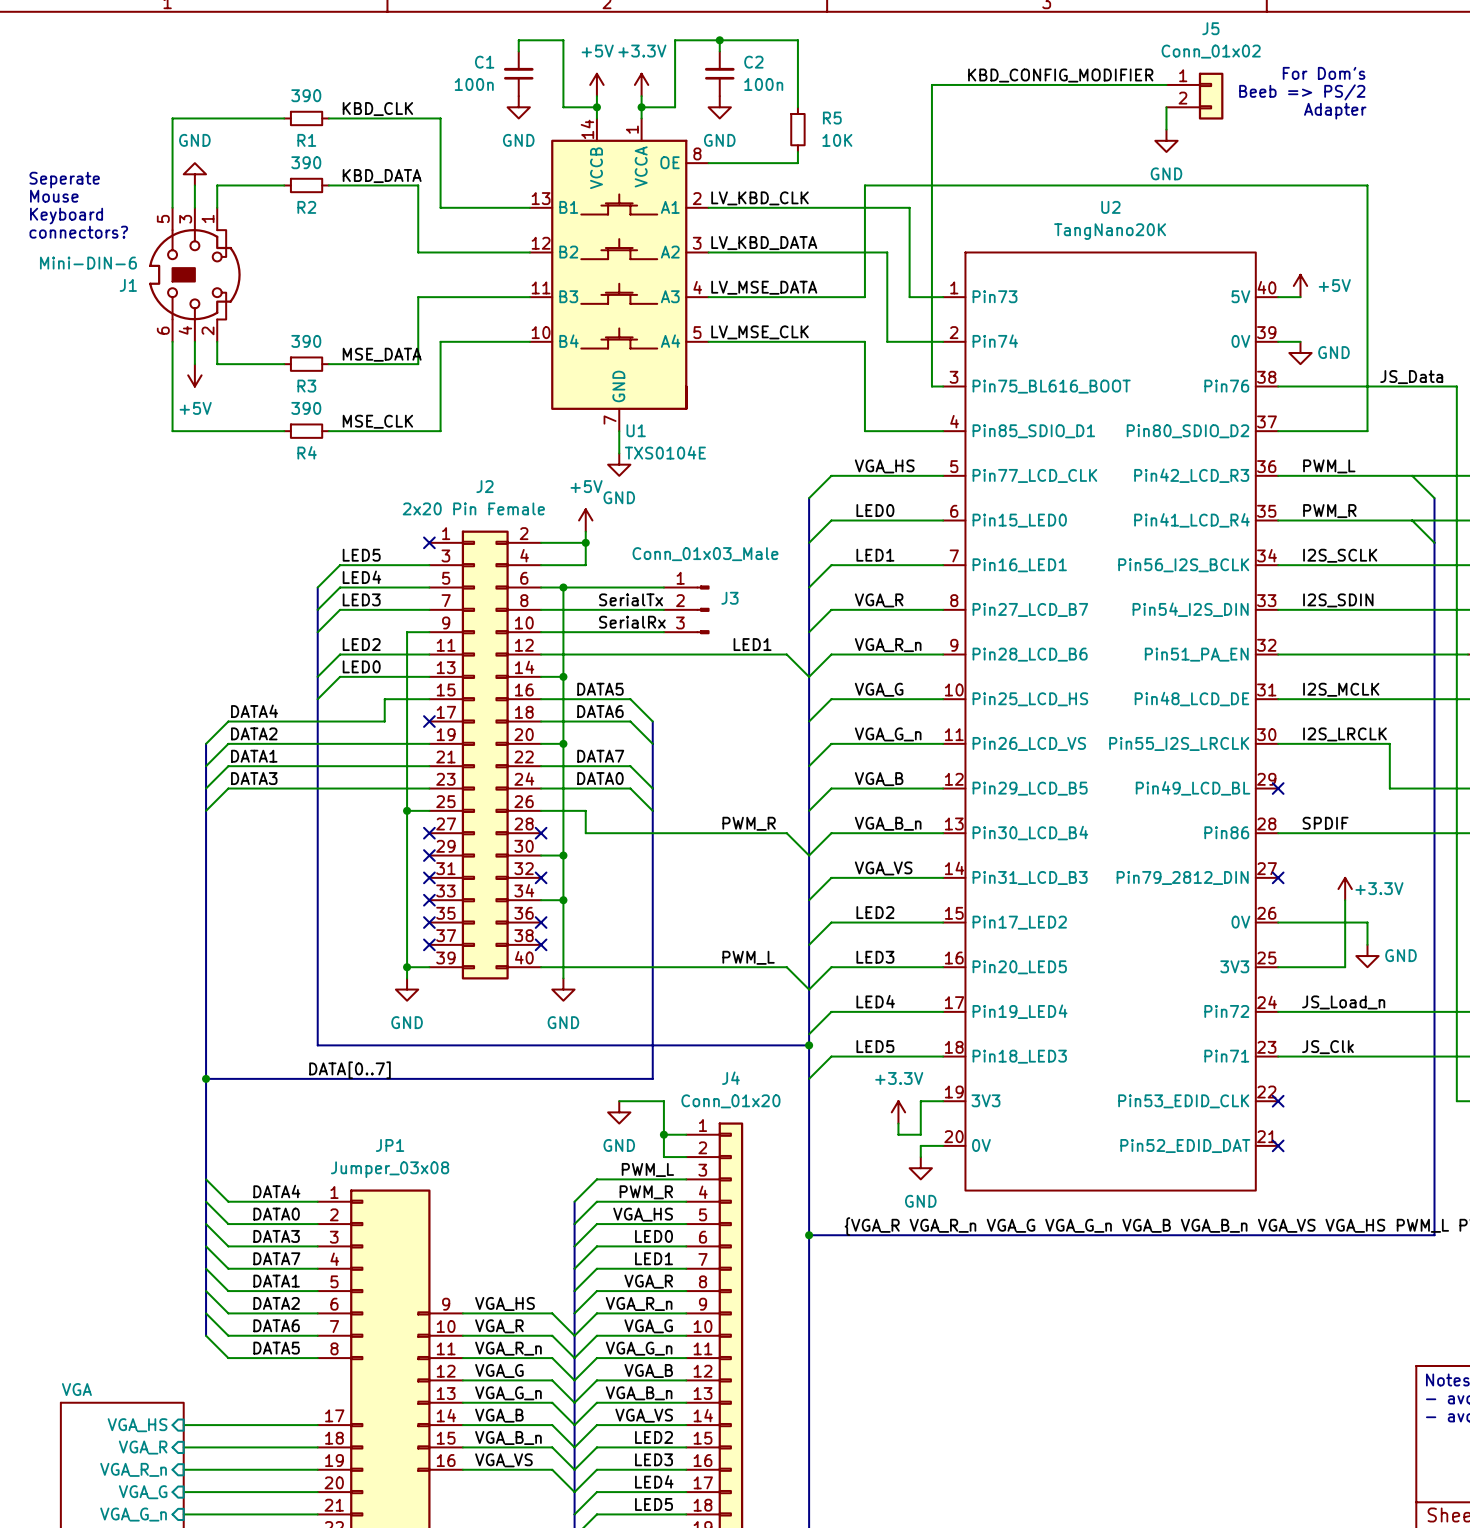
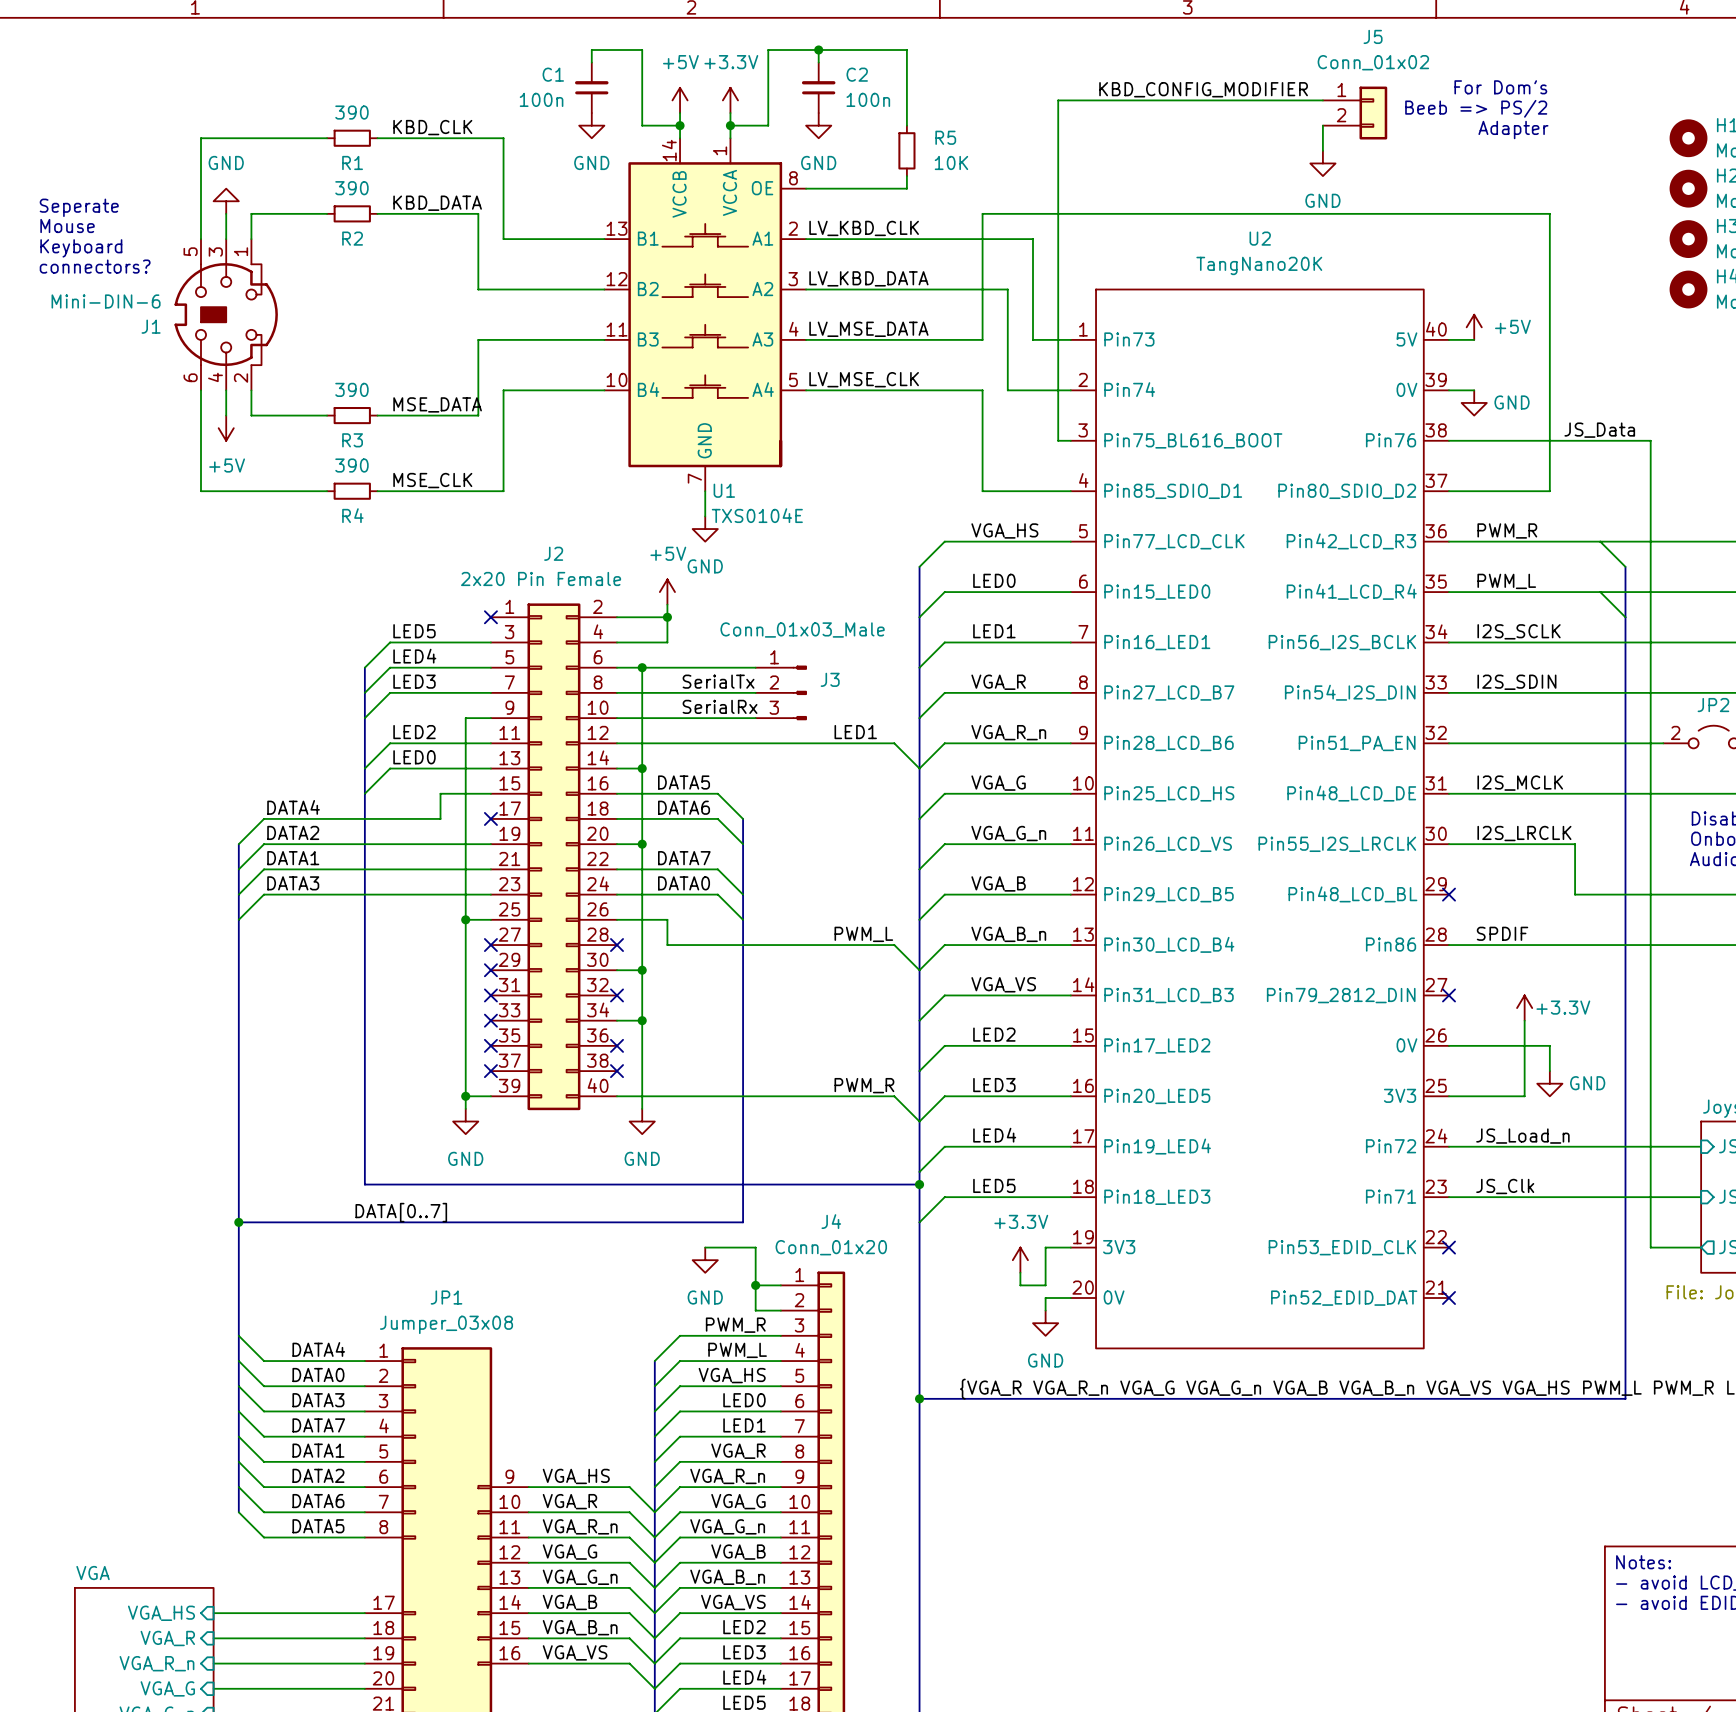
label: PWM_L (1329, 466) -> PWM_R (1507, 530)
label: PWM_R (1329, 511) -> PWM_L (1506, 581)
U2 pin name: Pin49_LCD_BL (1193, 788) -> Pin48_LCD_BL (1352, 894)
label position: PWM_R (749, 823) -> PWM_R (864, 1085)
label position: PWM_L (748, 957) -> PWM_L (863, 934)
label: PWM_L (647, 1169) -> PWM_R (735, 1325)
label: PWM_R (646, 1192) -> PWM_L (737, 1350)

